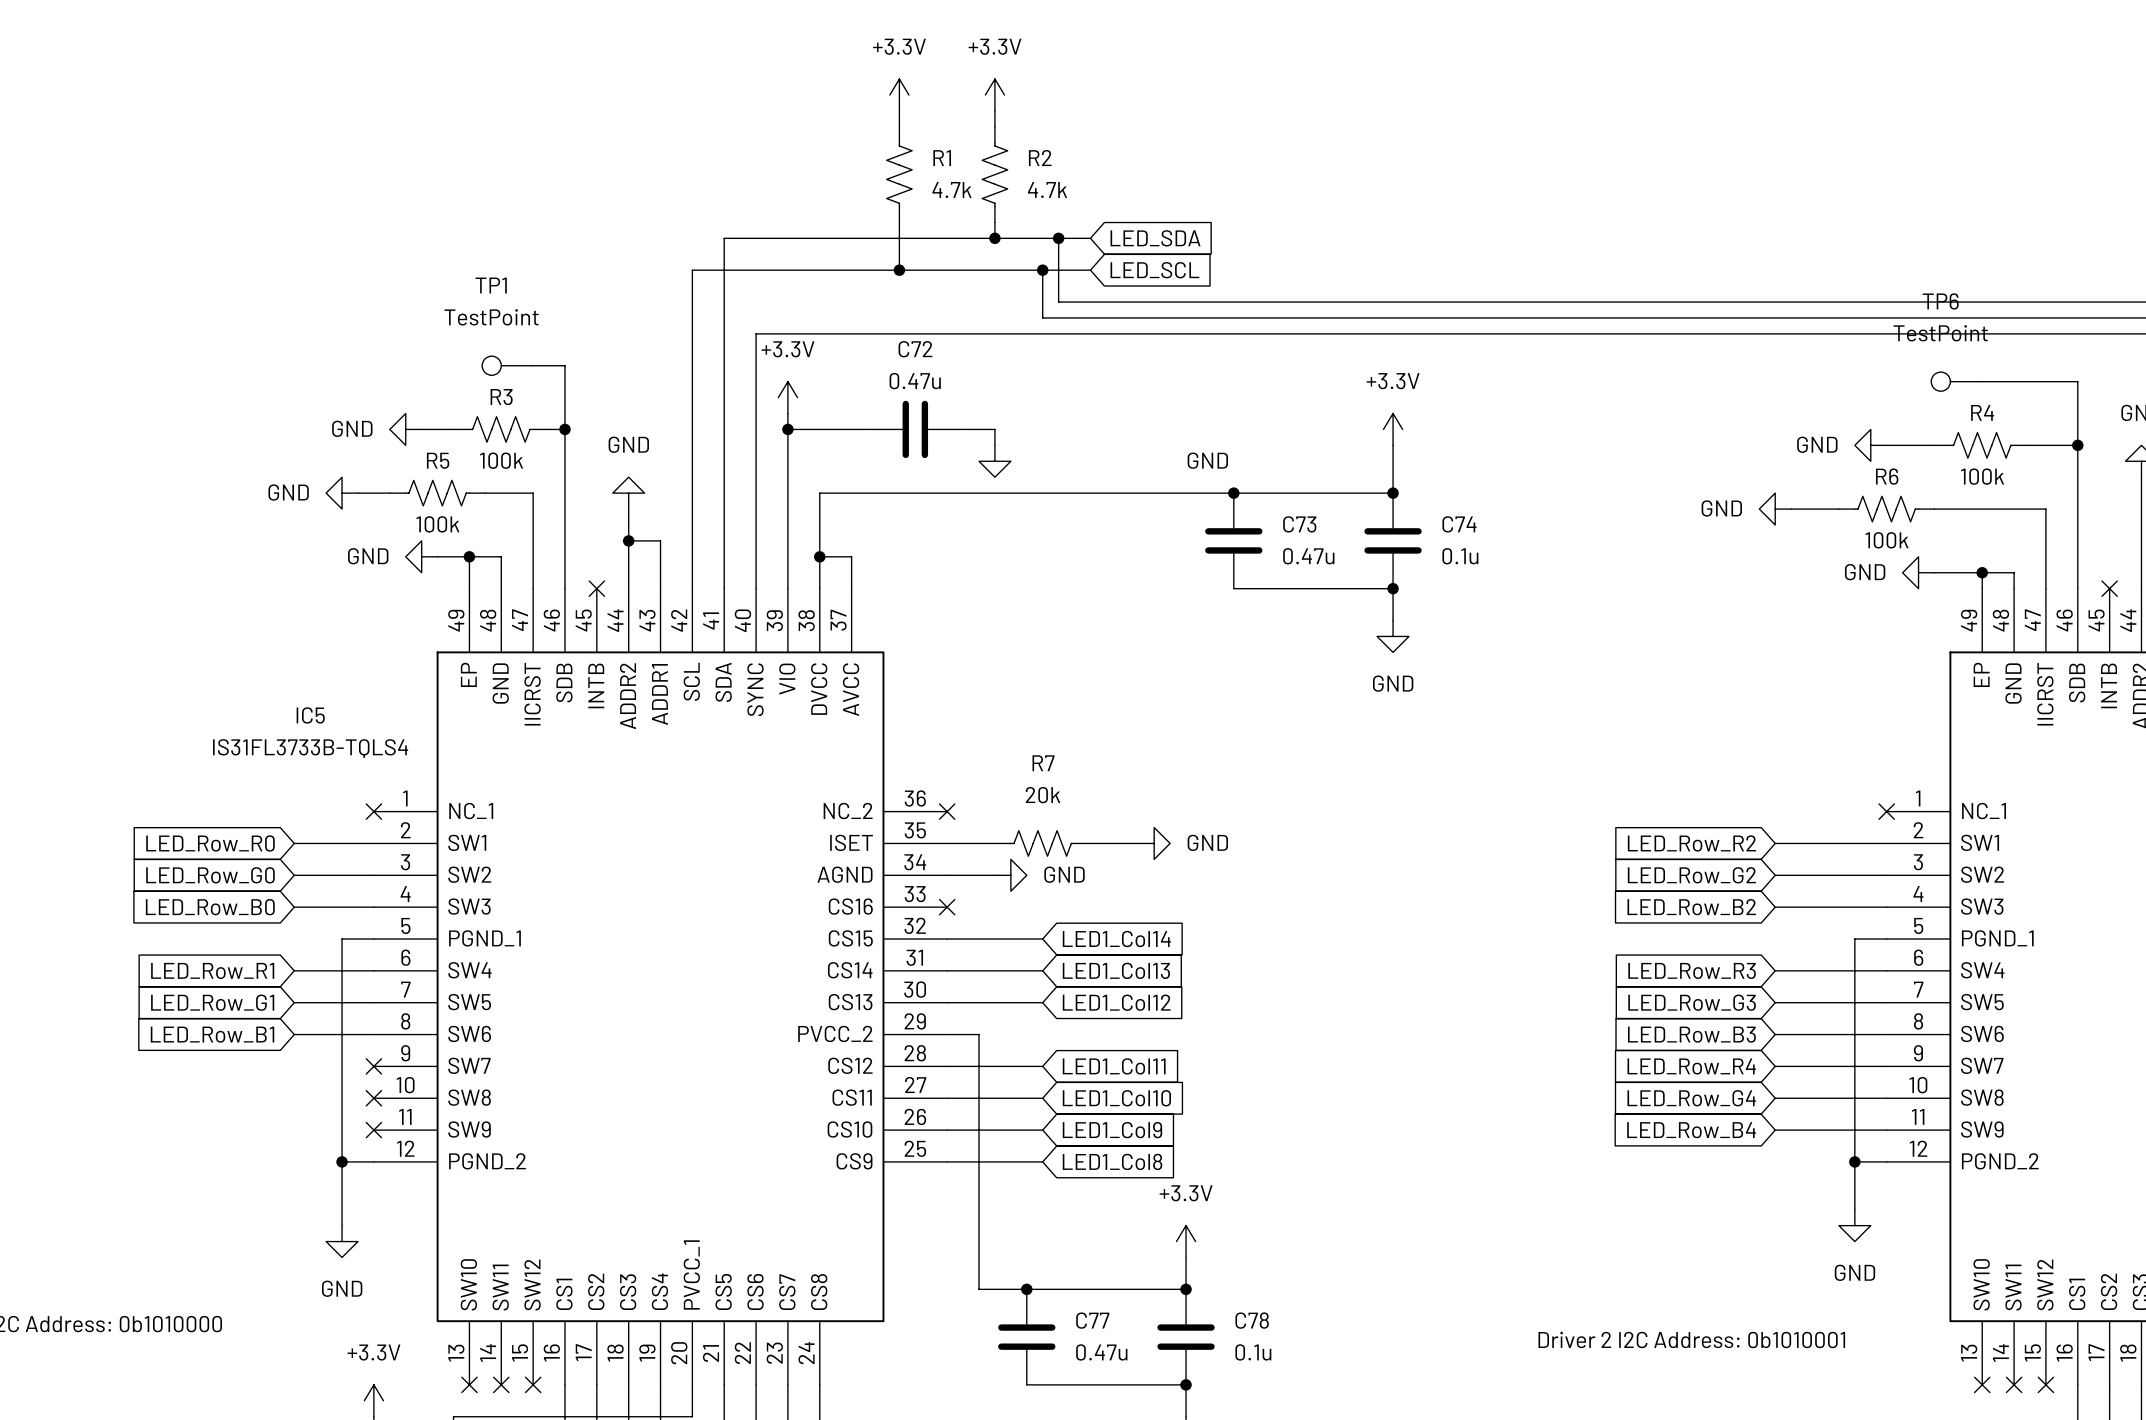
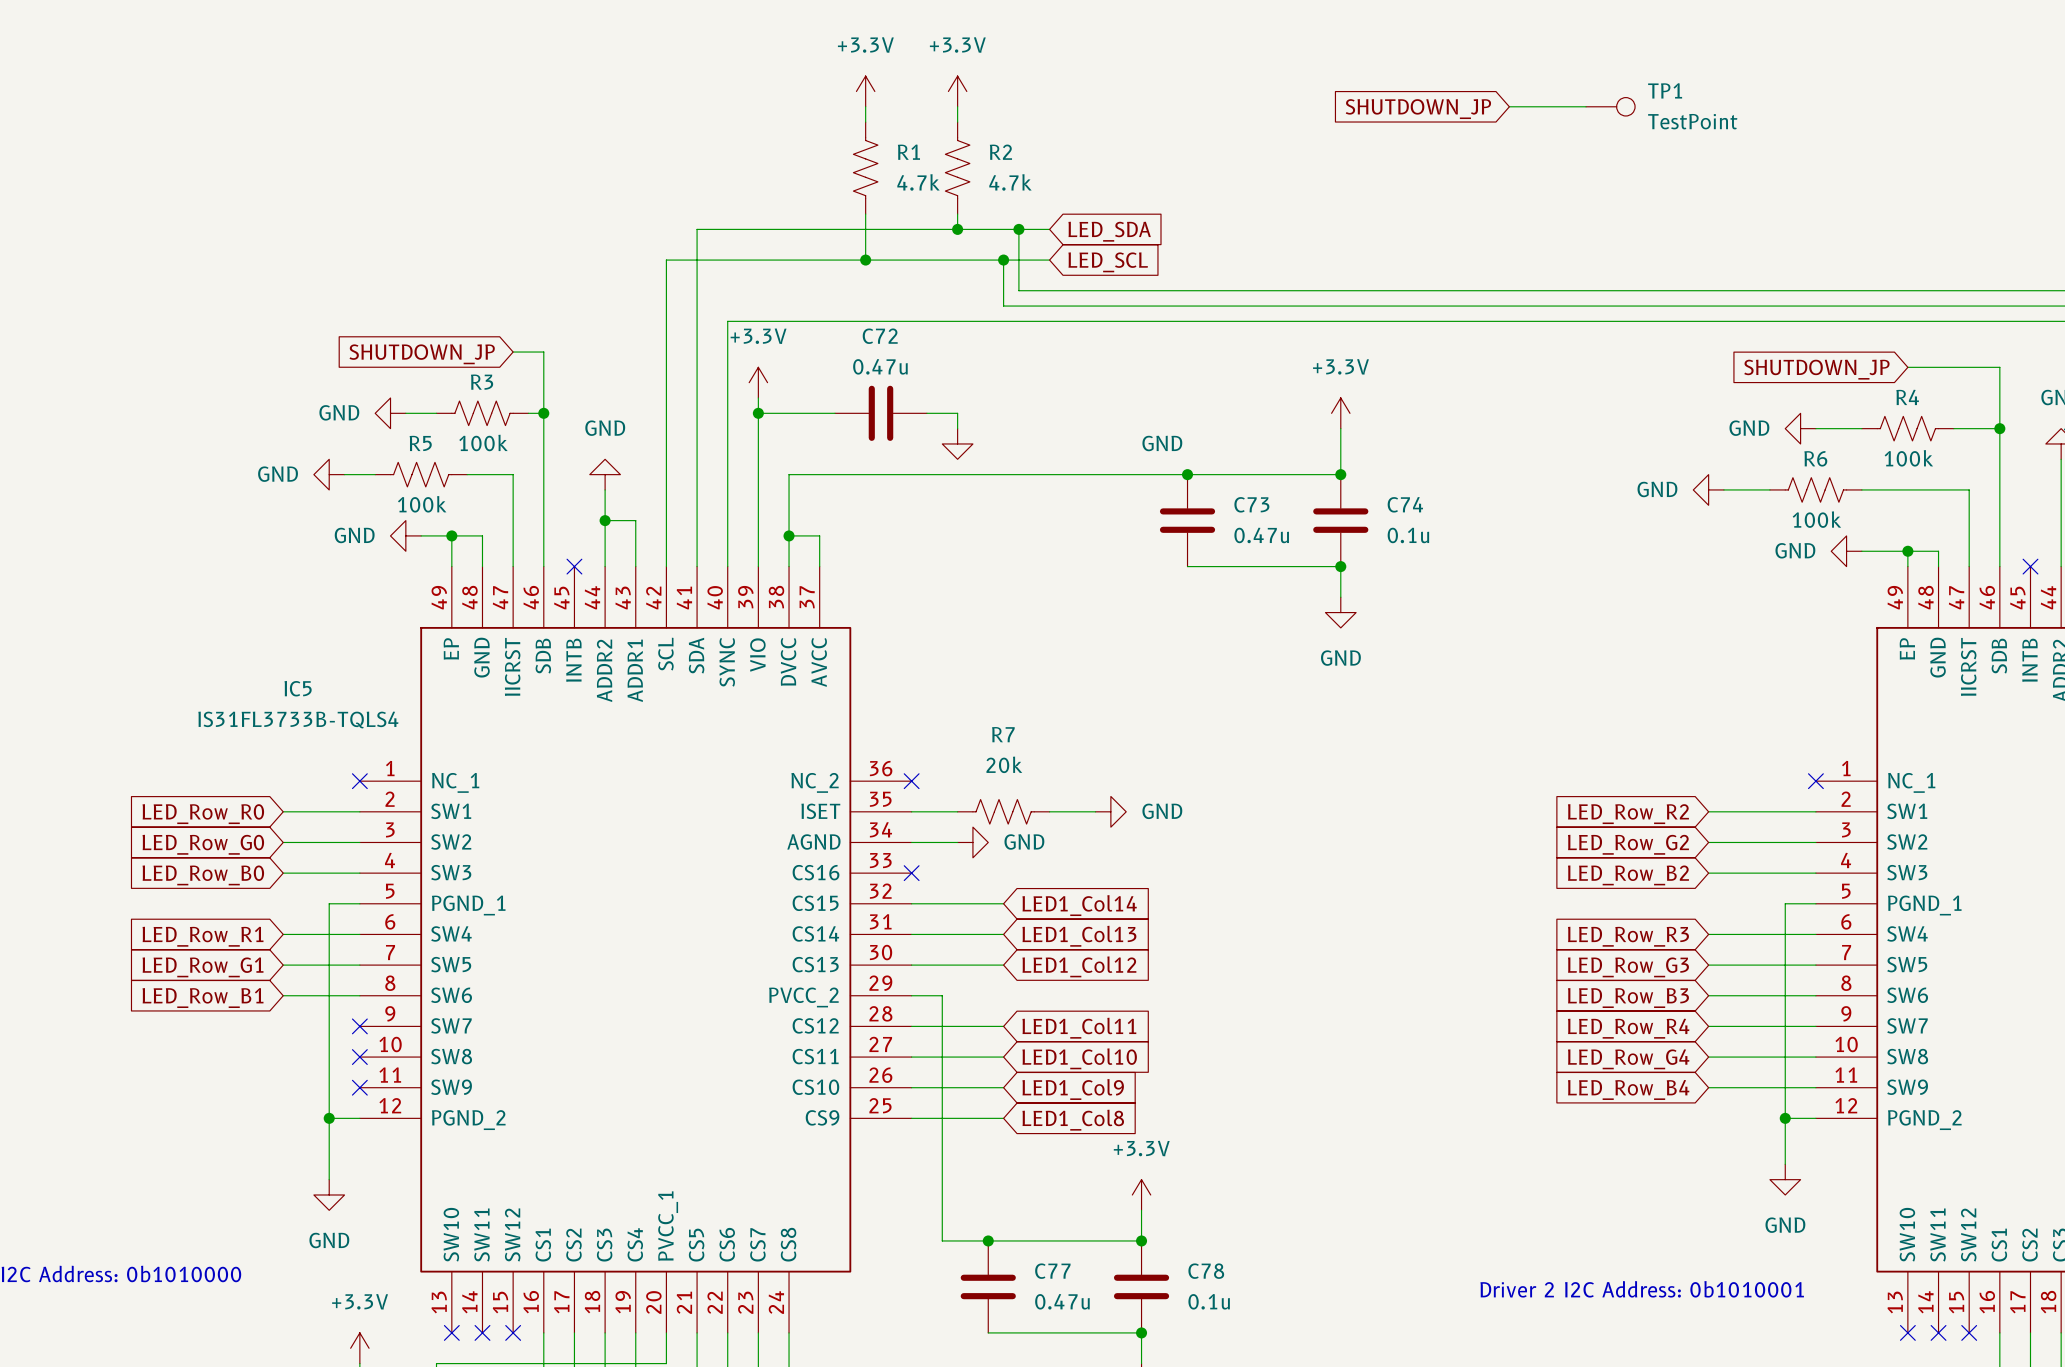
global label: none -> SHUTDOWN_JP (1418, 109)
wire: none -> (1509, 106) (1586, 106)
TP1 name position: TP1 (491, 285) -> TP1 (1665, 90)
TP1 value position: TestPoint (491, 317) -> TestPoint (1692, 121)
global label: none -> SHUTDOWN_JP (422, 354)
TP1 rotation: 0° (491, 365) -> 180° (1625, 106)
TP1 position: (507, 365) -> (1610, 106)
global label: none -> SHUTDOWN_JP (1816, 369)
TP6: TestPoint (1956, 381) -> none

